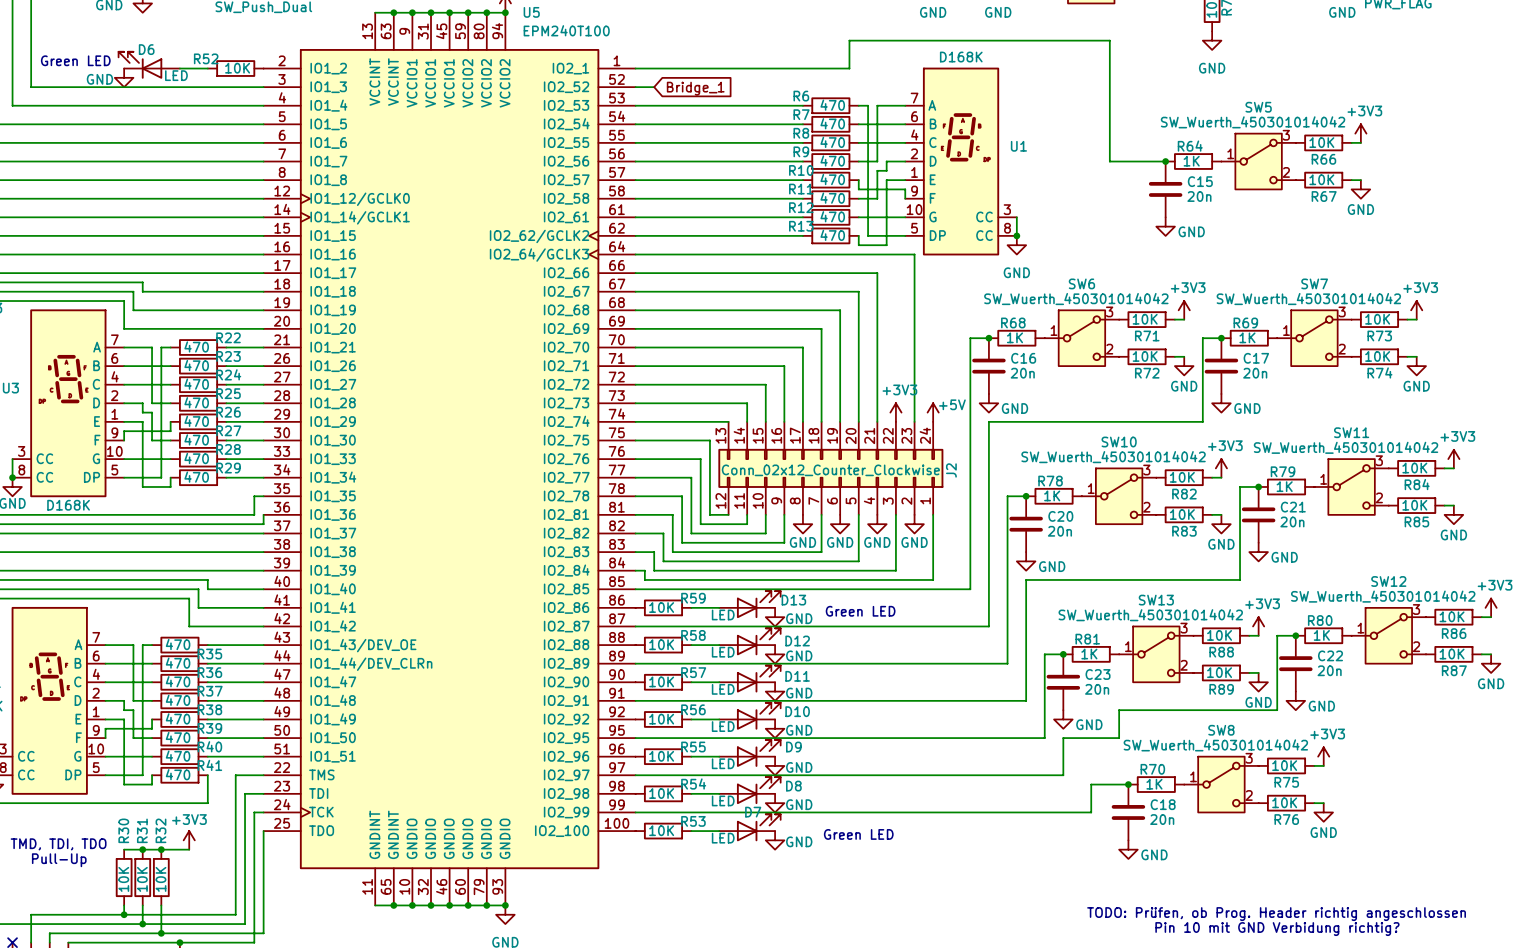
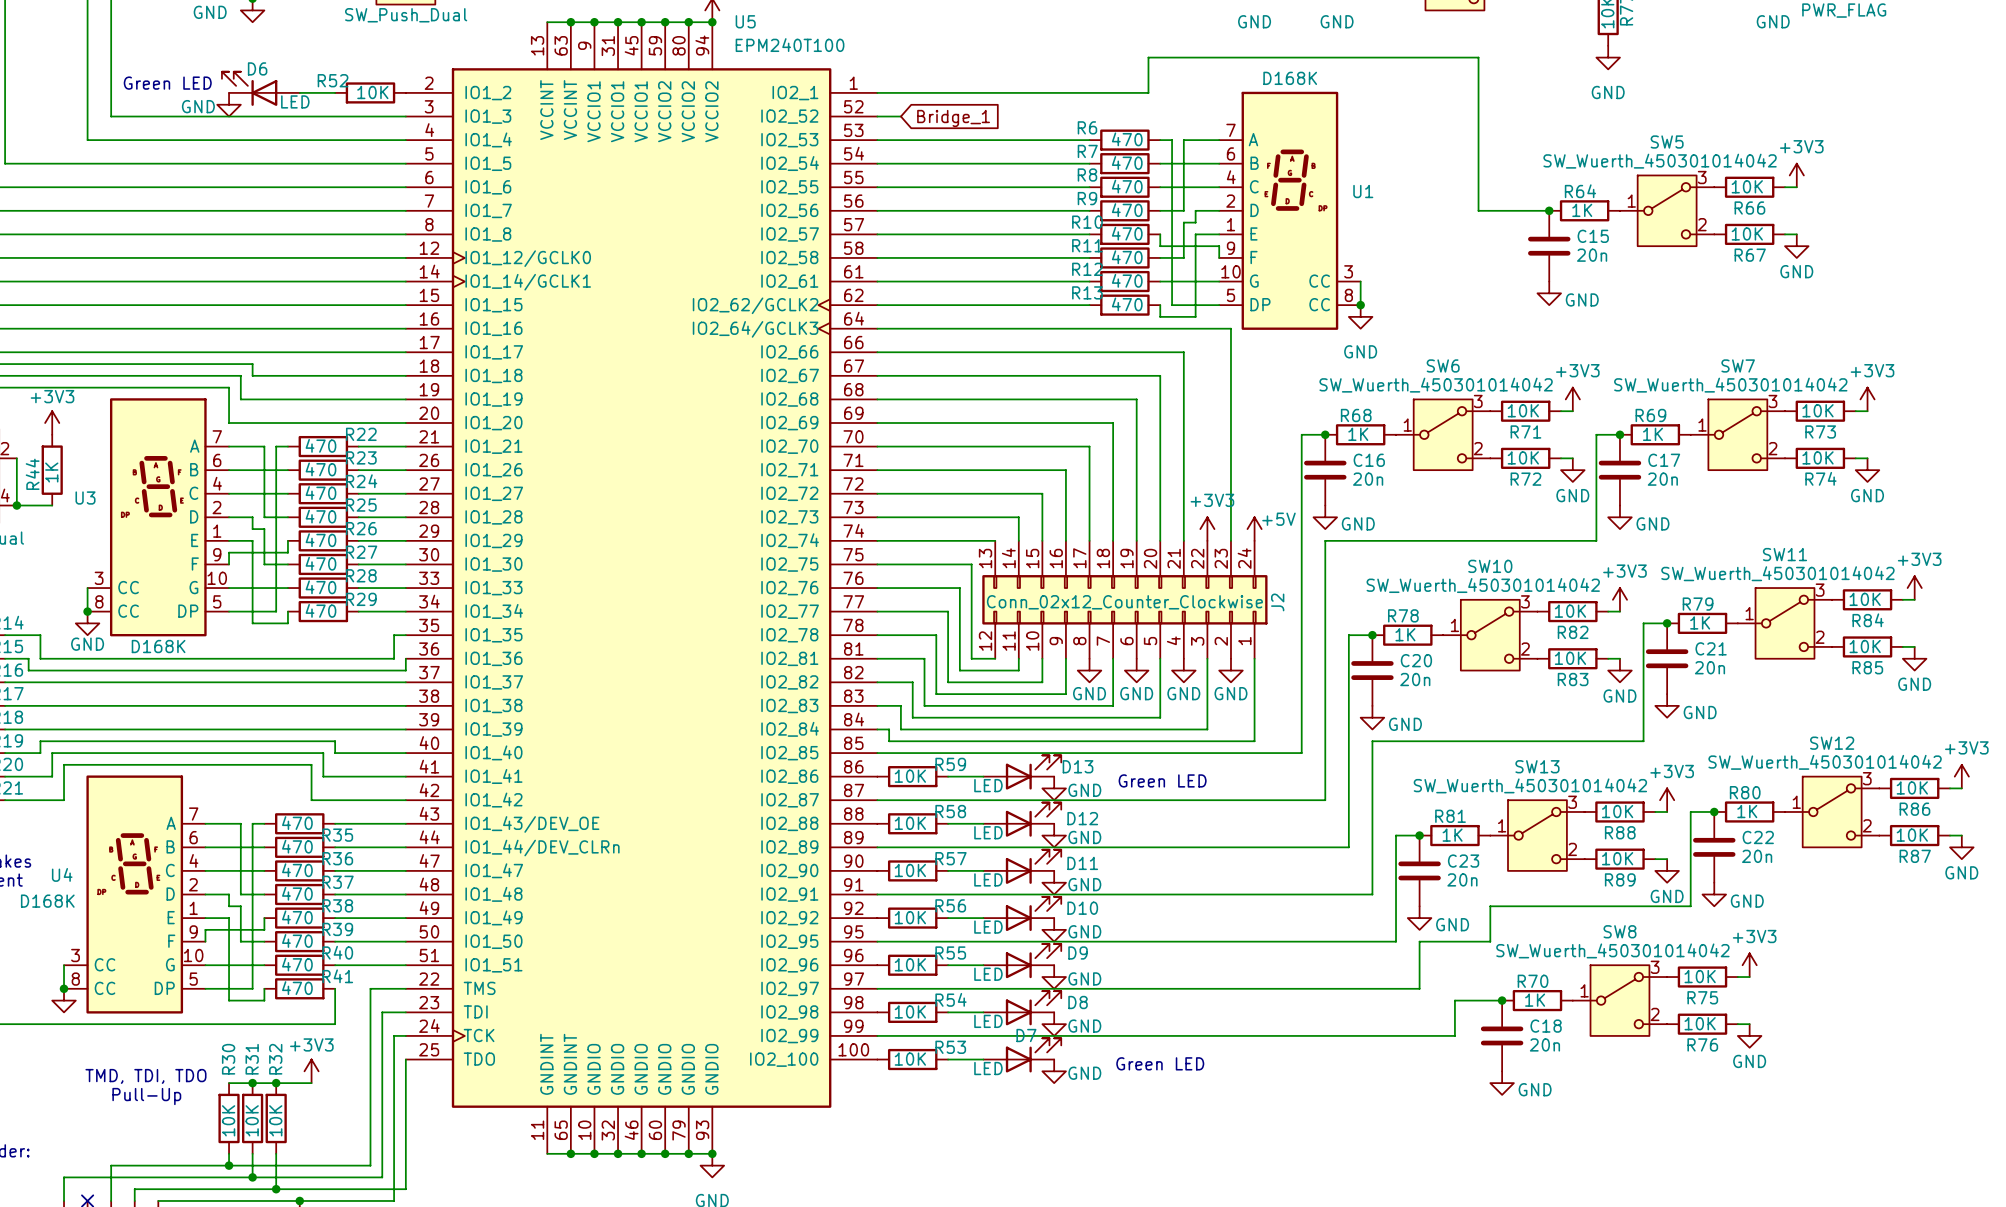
text: TODO: Prüfen, ob Prog. Header richtig angeschlossen (1276, 914) -> none
text: Pin 10 mit GND Verbidung richtig? (1277, 929) -> none

